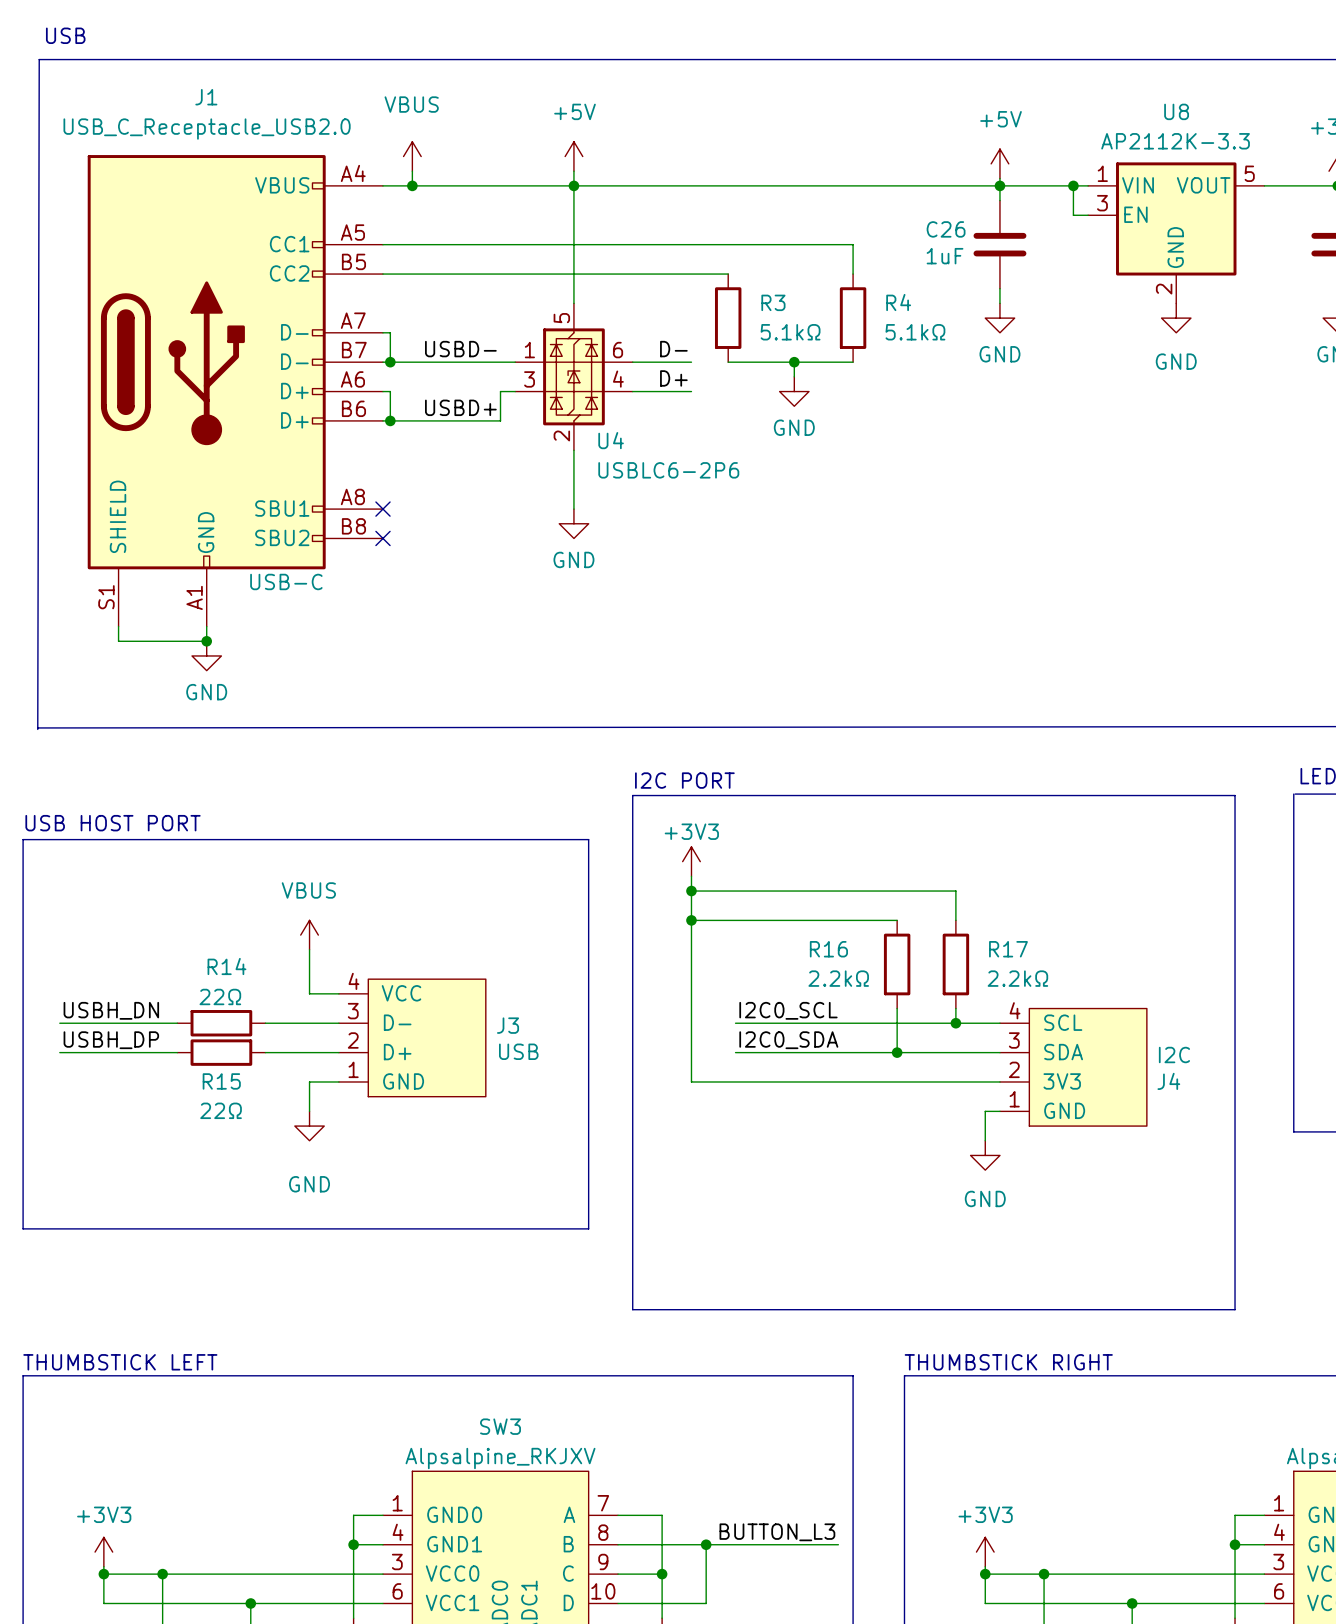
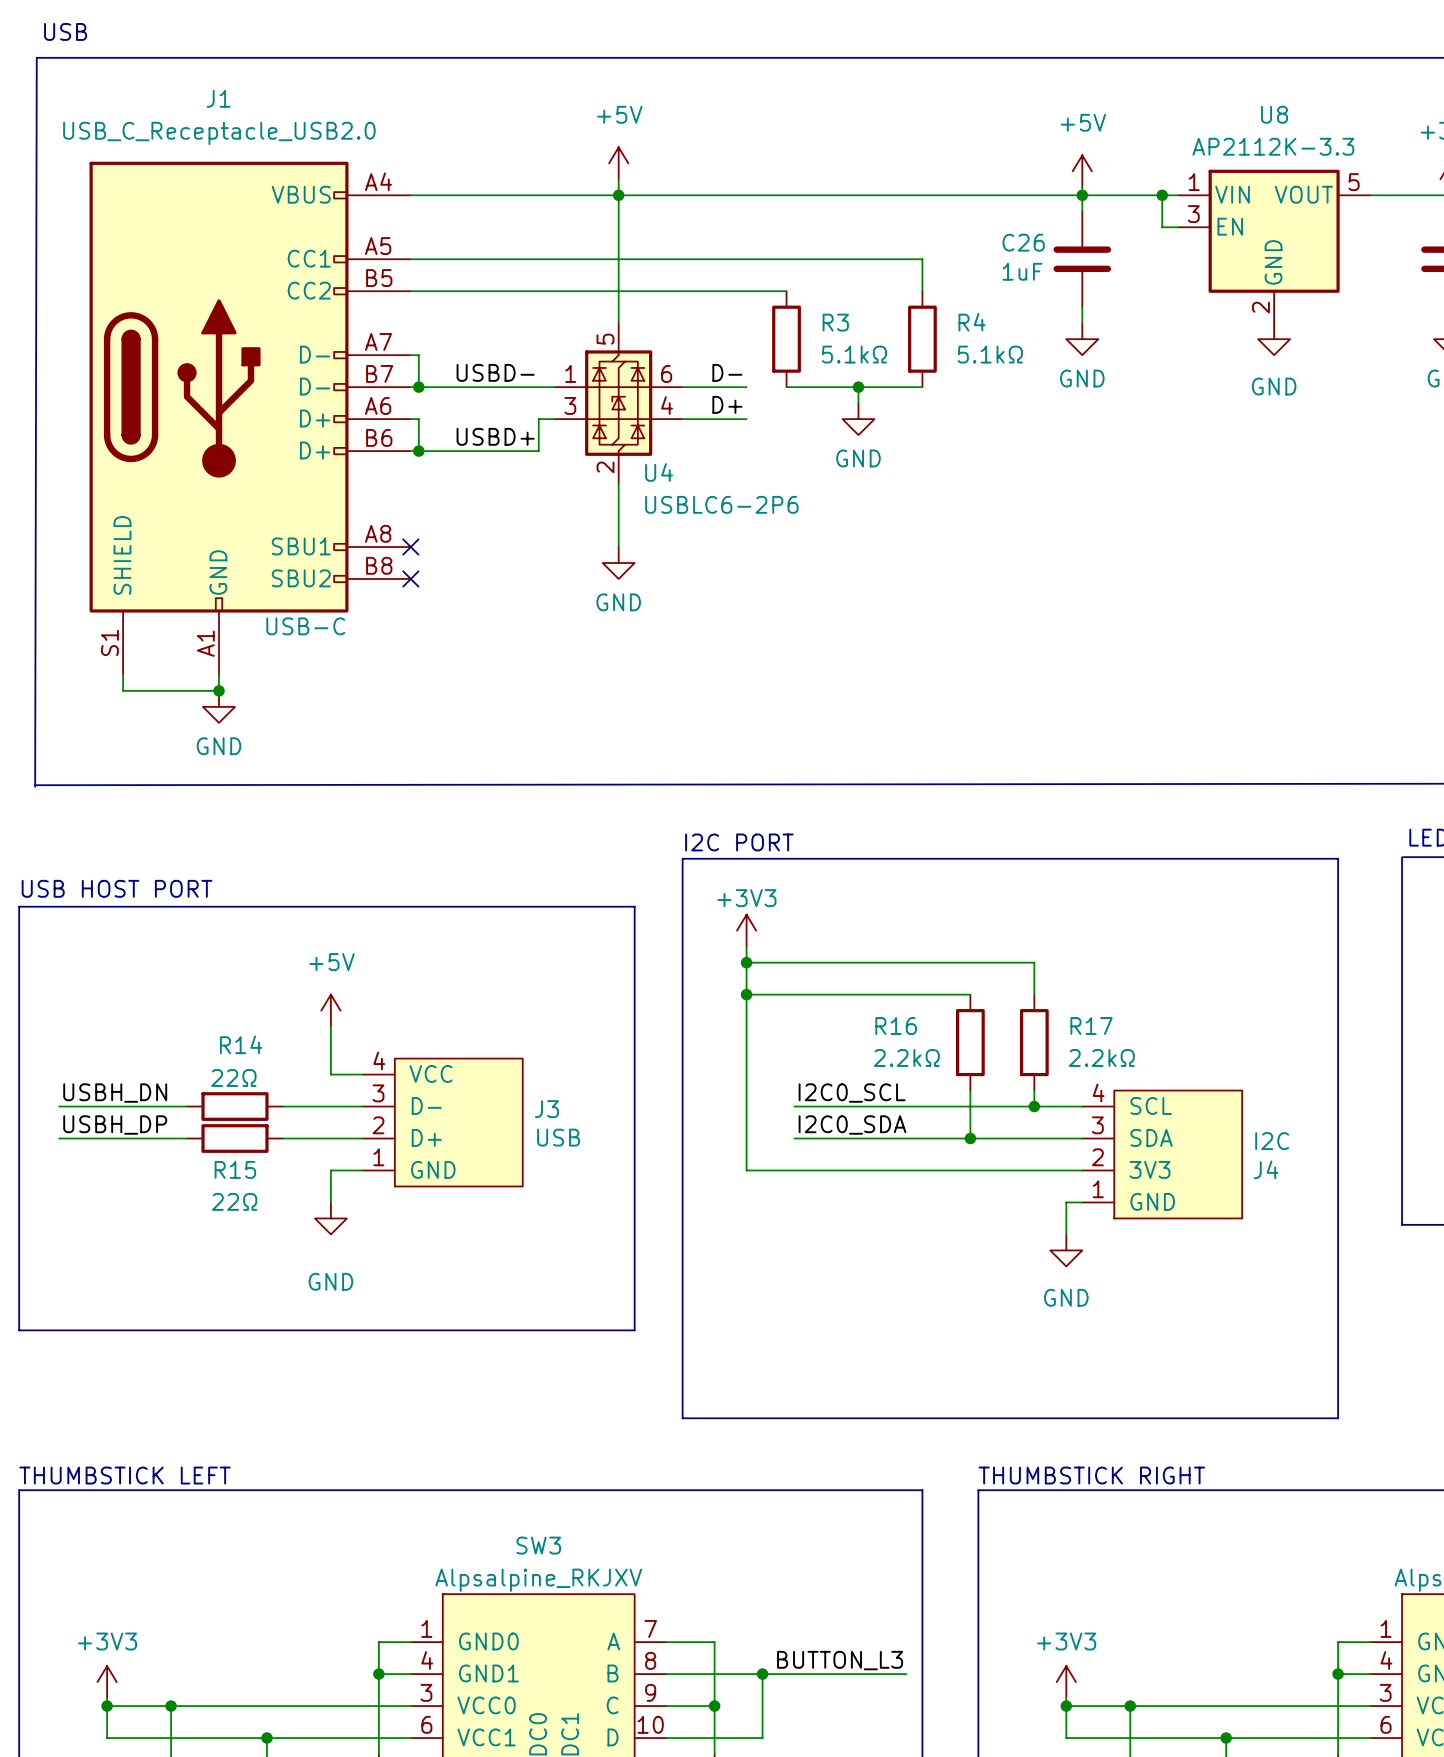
power symbol: VBUS (412, 156) -> none
wire: (412, 171) (412, 185) -> none
junction: (412, 185) -> none
power symbol: VBUS (309, 935) -> +5V (330, 1010)

